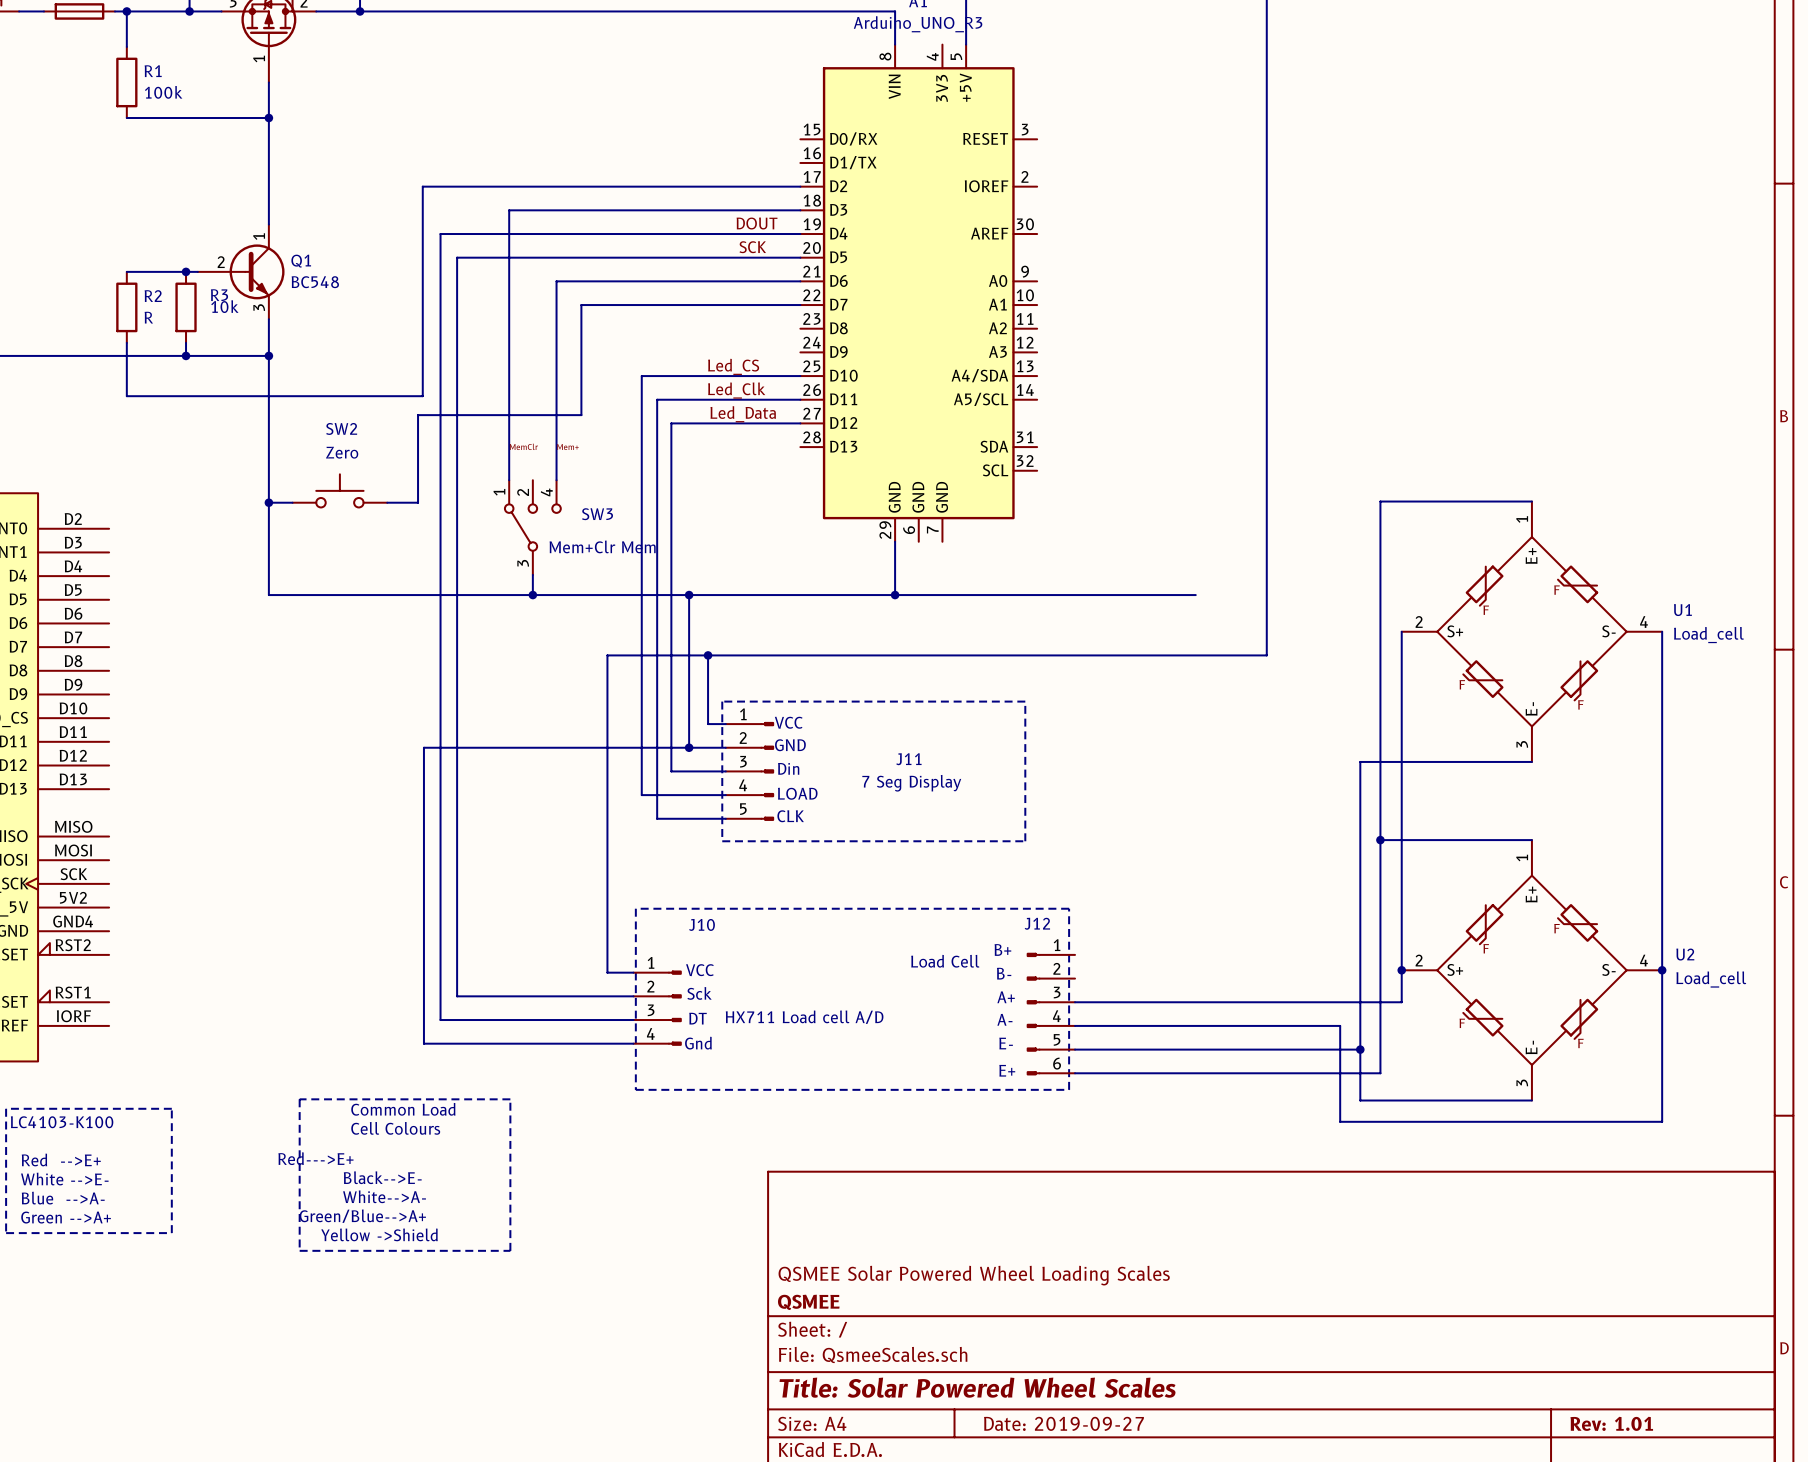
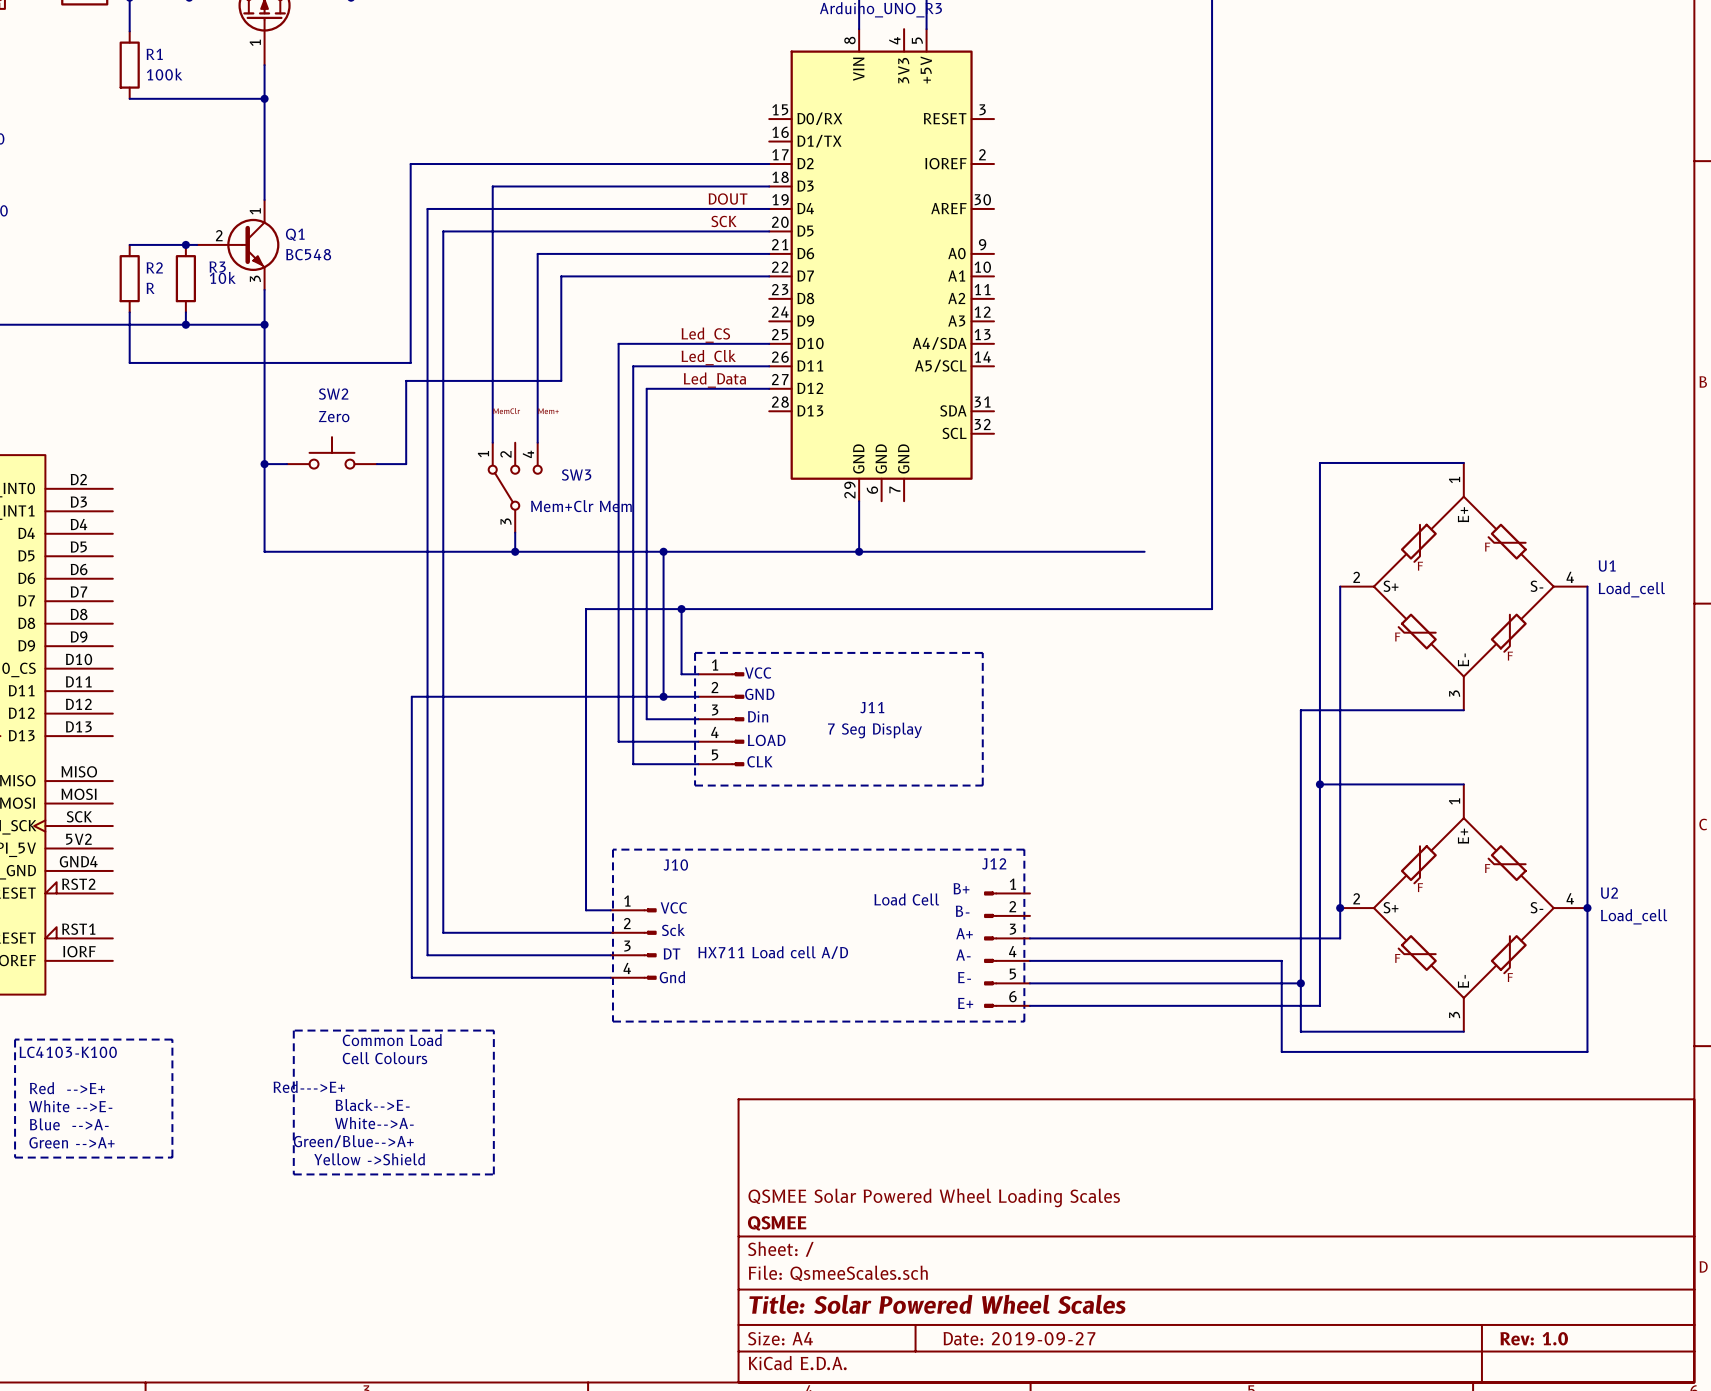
title block: Rev: 1.01 (1611, 1423) -> Rev: 1.0 (1534, 1338)

